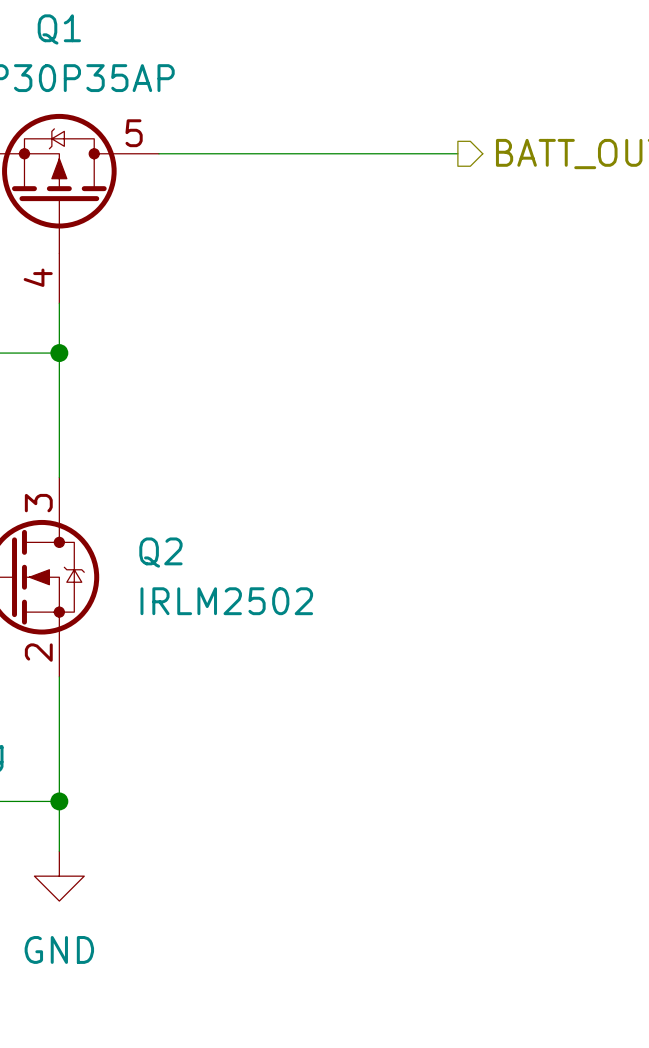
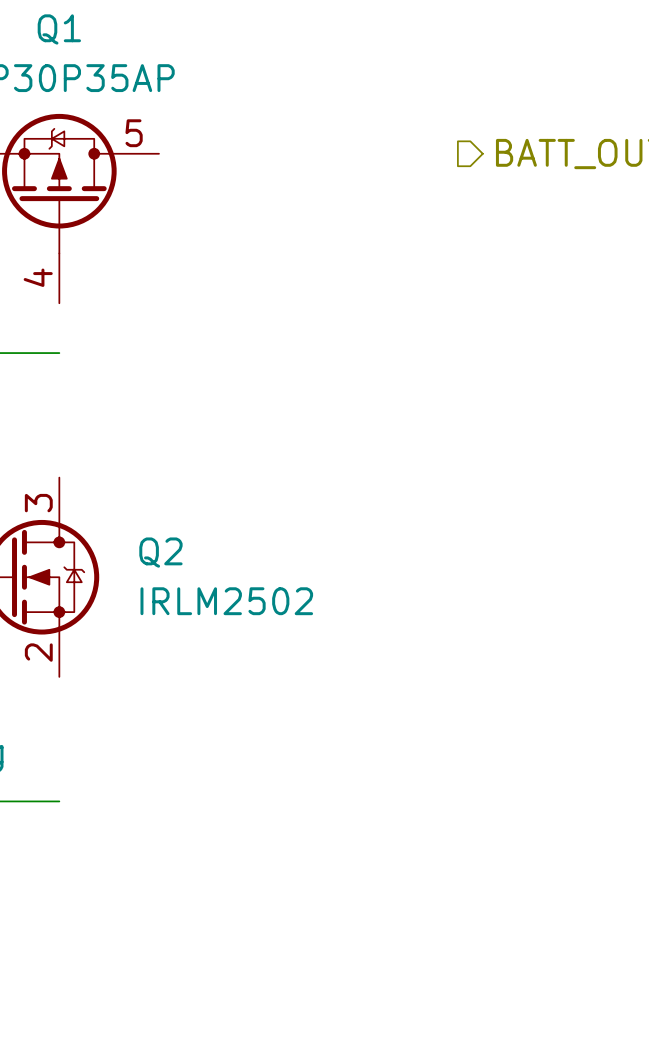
wire: (158, 153) (457, 153) -> none
wire: (59, 303) (59, 477) -> none
junction: (59, 353) -> none
wire: (59, 676) (59, 851) -> none
junction: (59, 801) -> none
power symbol: GND (59, 876) -> none

